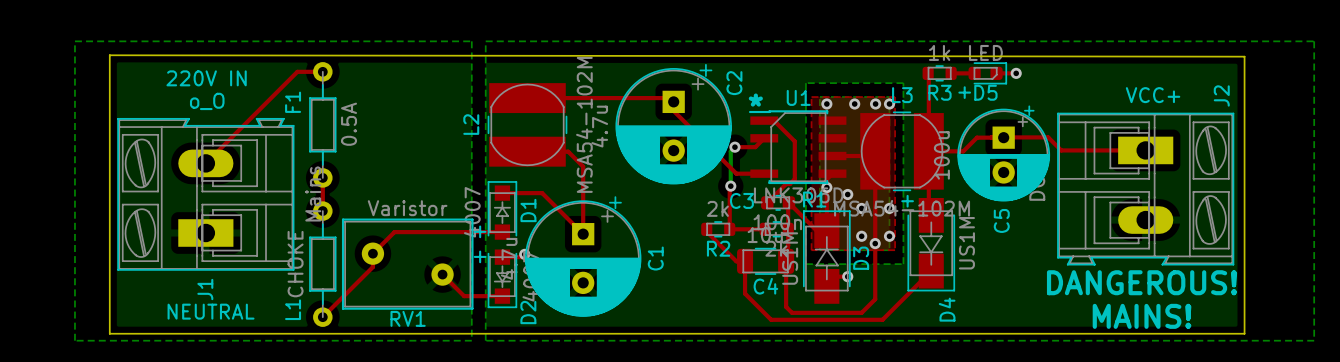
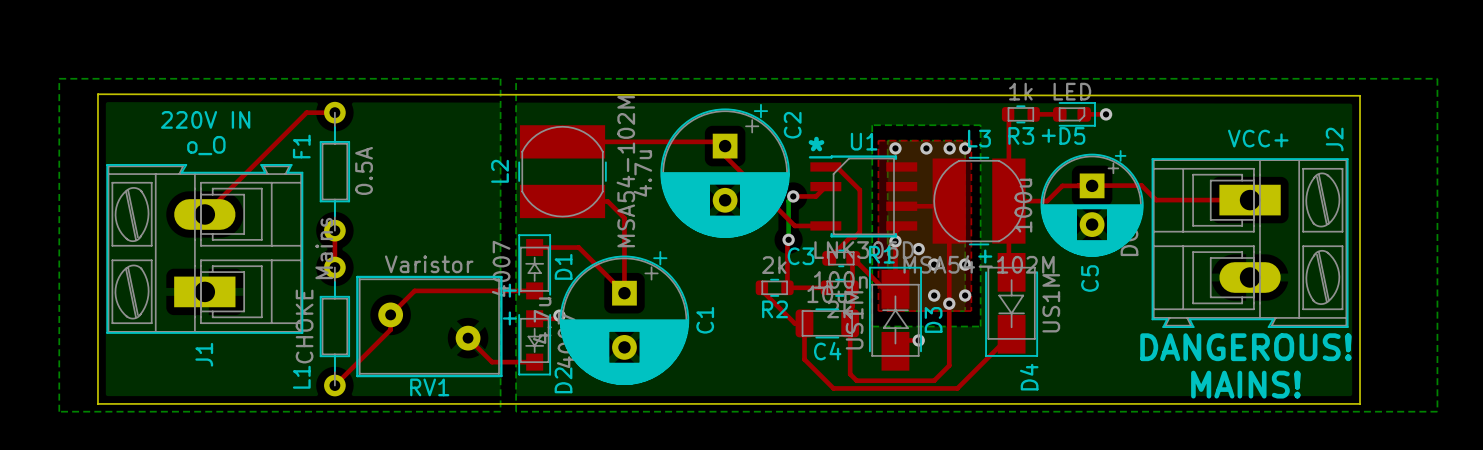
text: NEUTRAL (211, 311) -> none

